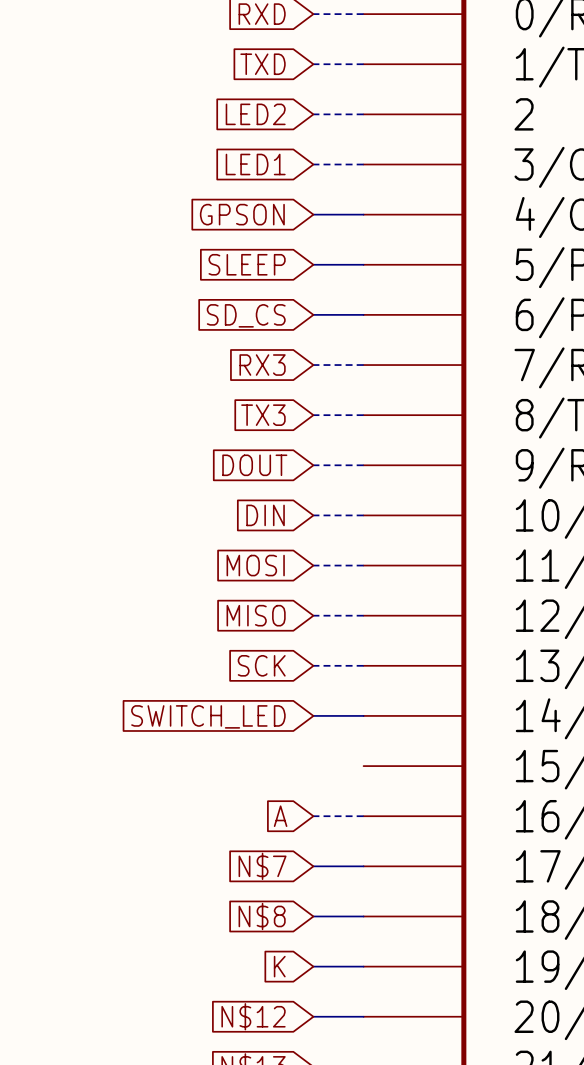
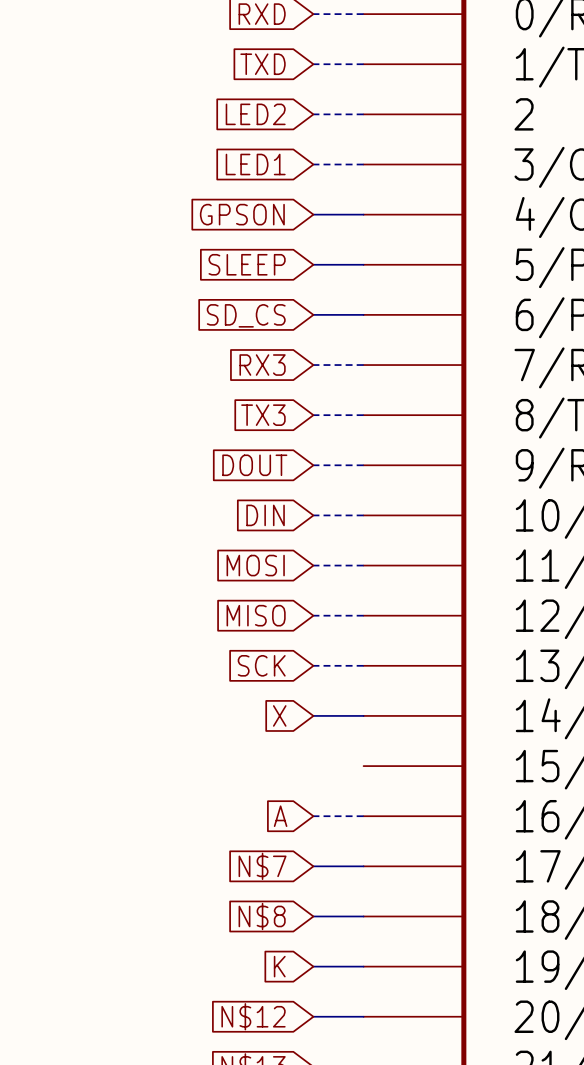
global label: SWITCH_LED (208, 716) -> X (279, 715)

